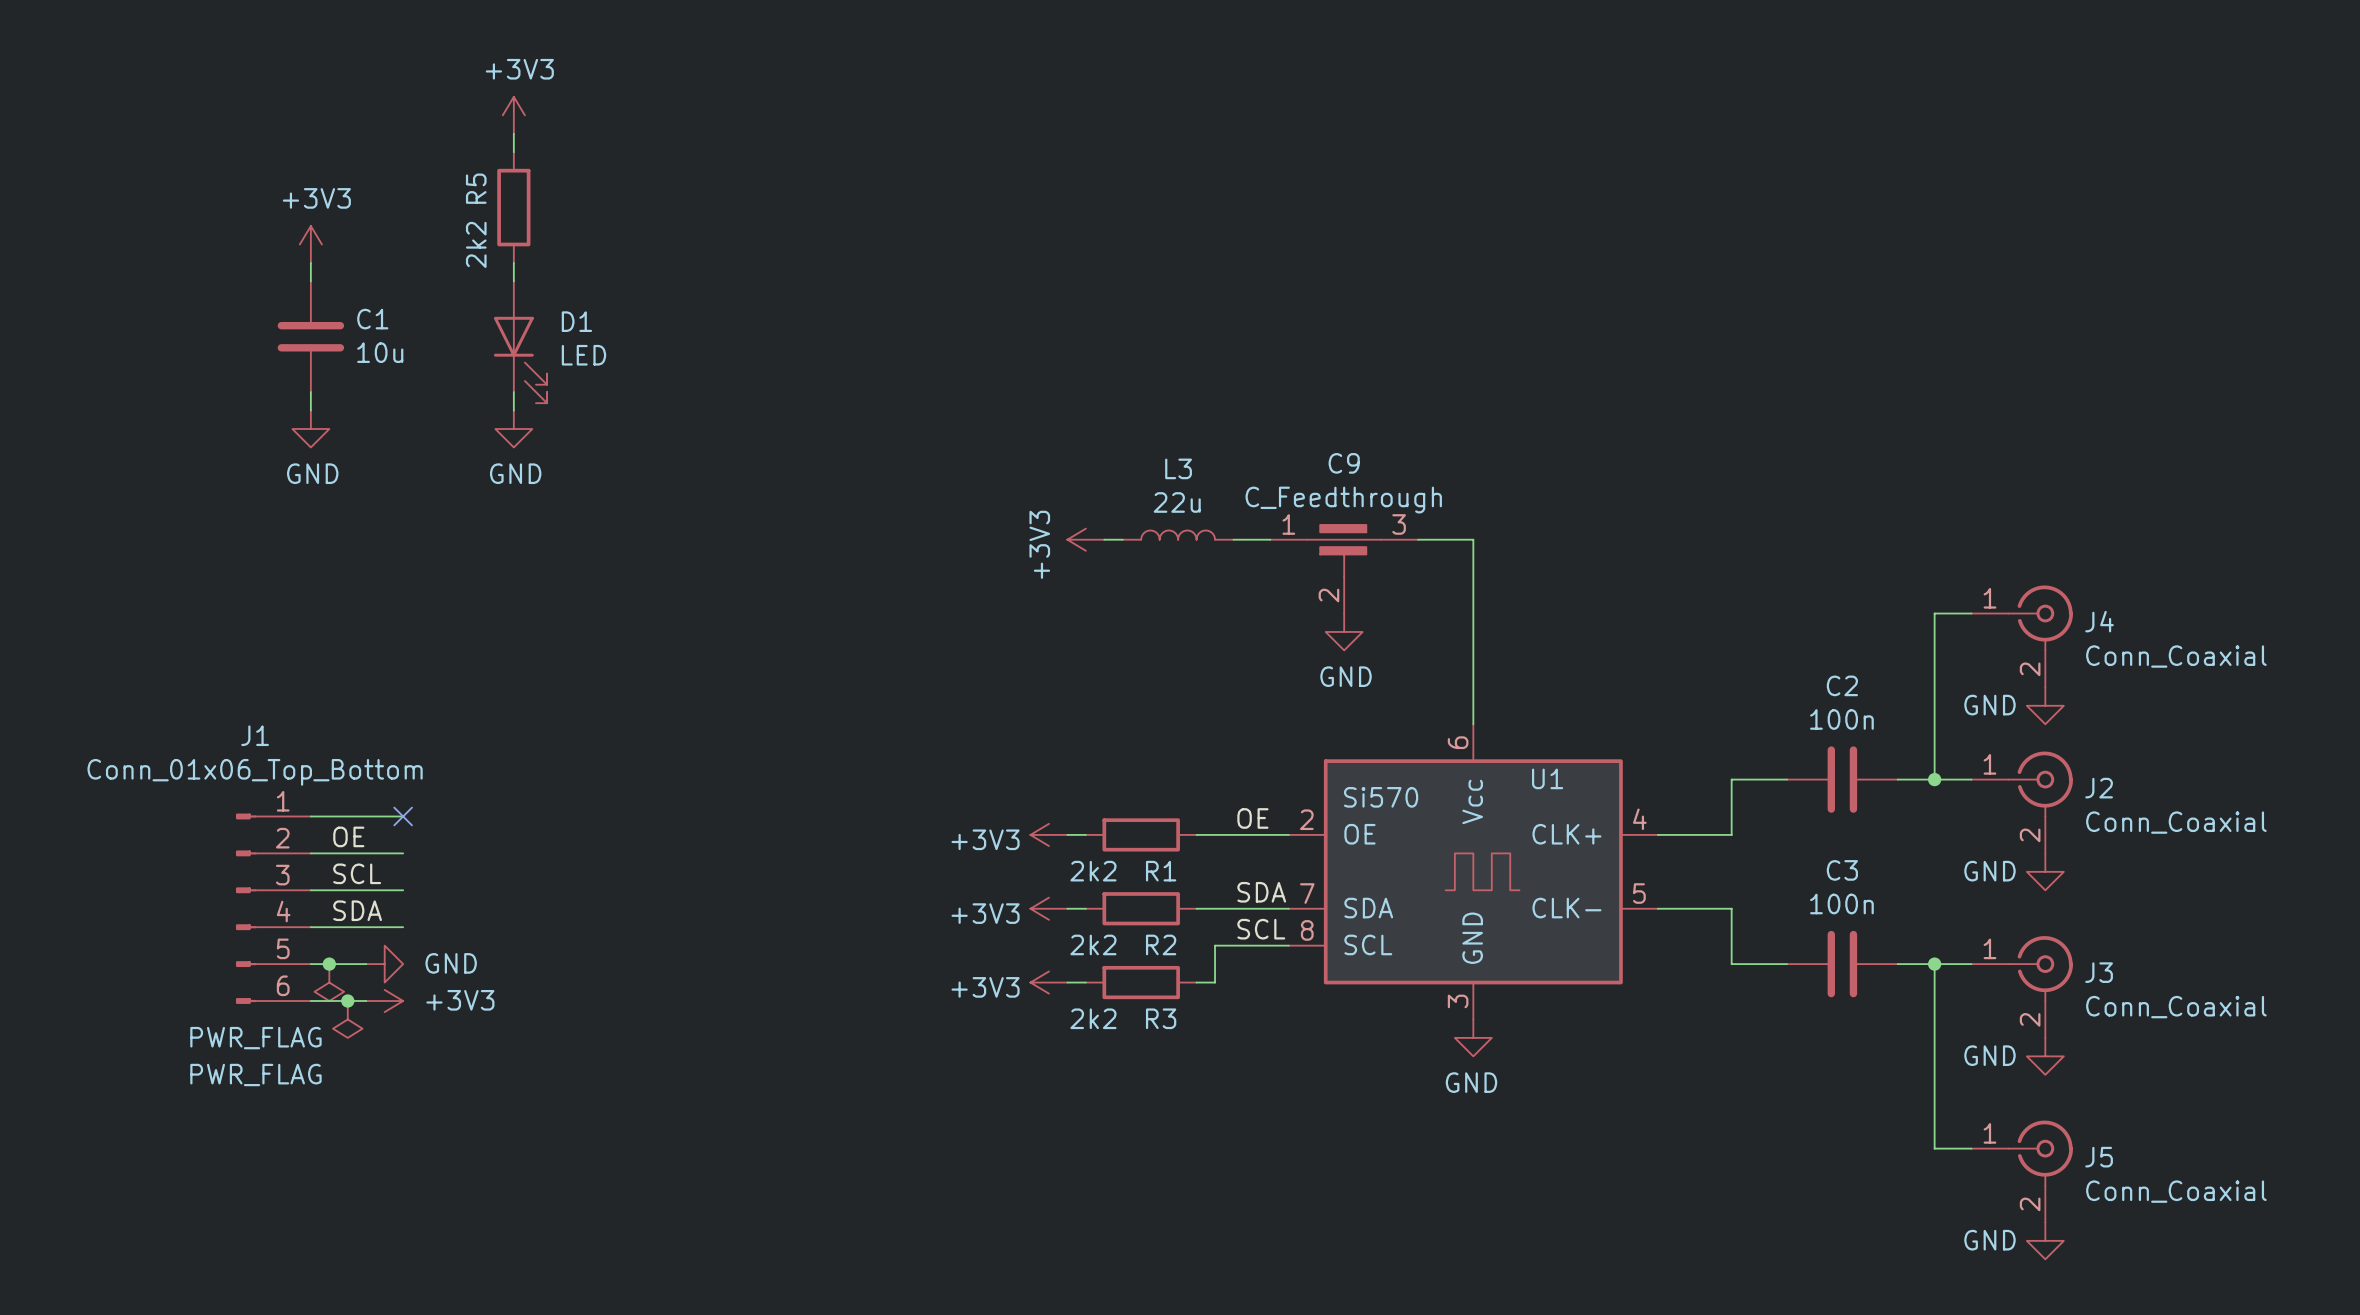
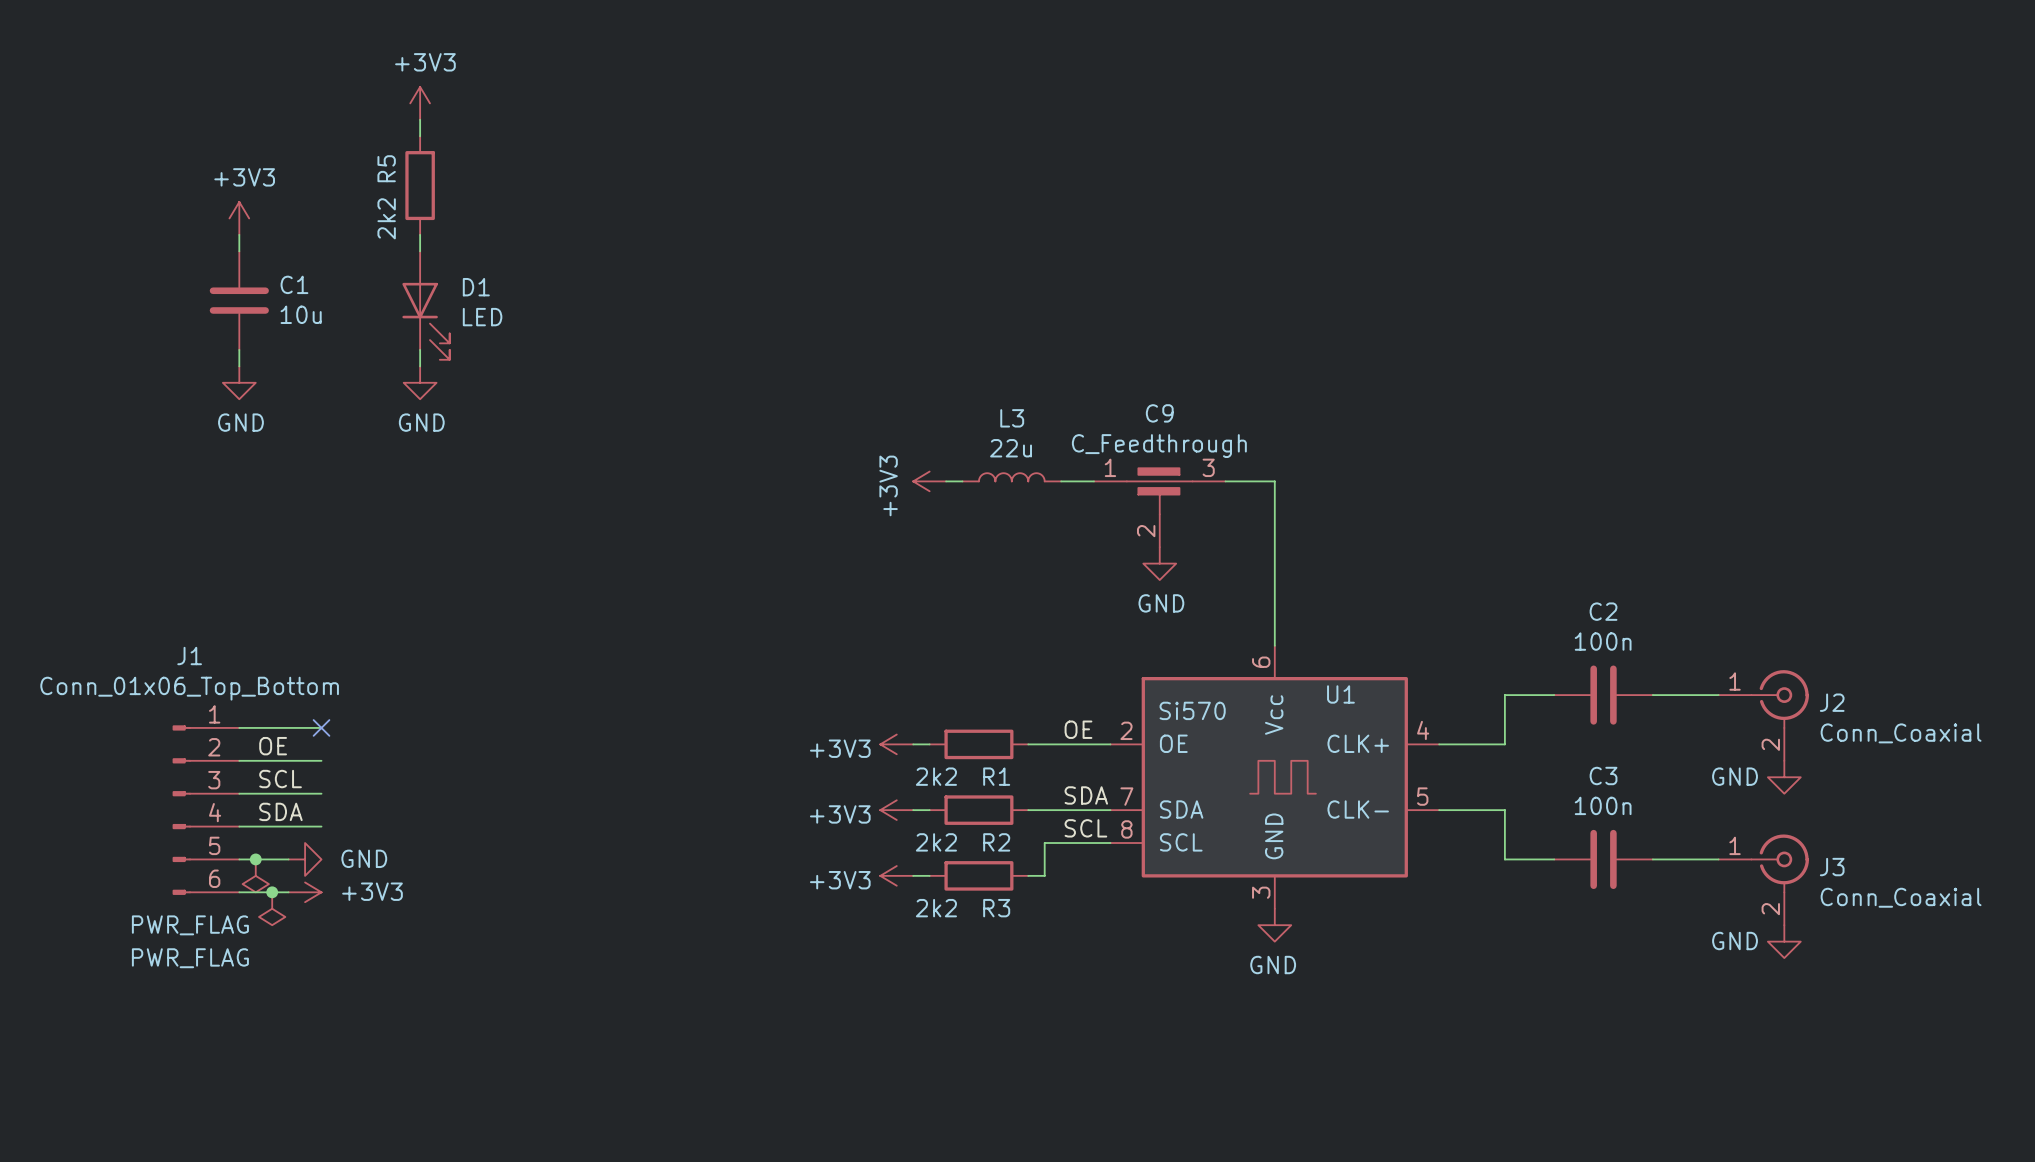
wire: (1971, 613) (1934, 613) (1934, 779) -> none
J4: Conn_Coaxial (2022, 636) -> none
power symbol: GND (2045, 705) -> none
junction: (1934, 779) -> none
wire: (1934, 964) (1934, 1148) (1971, 1148) -> none
junction: (1934, 964) -> none
J5: Conn_Coaxial (2022, 1171) -> none
power symbol: GND (2045, 1240) -> none

